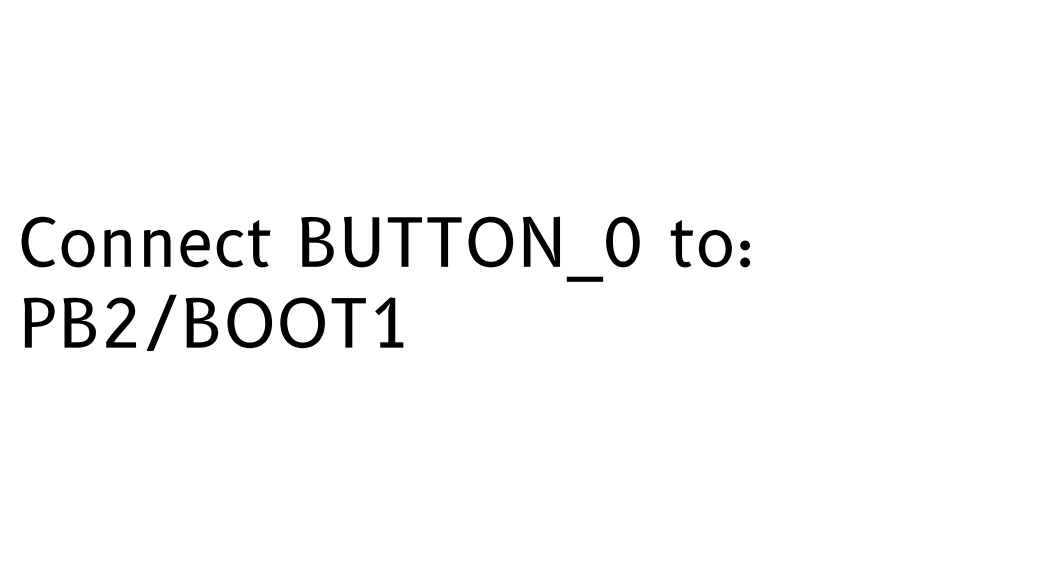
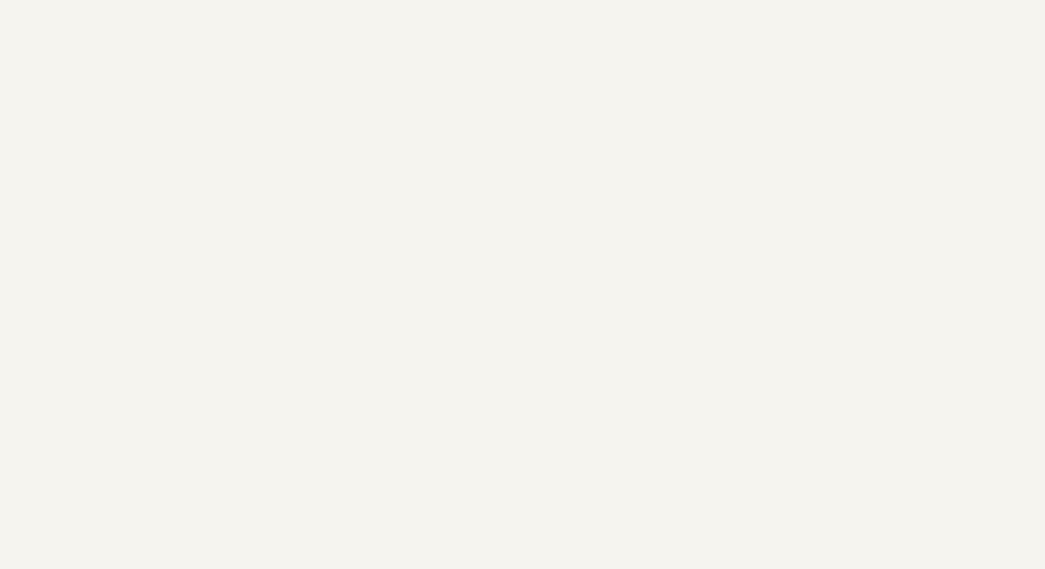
text: Connect BUTTON_0 to: (385, 249) -> none
text: PB2/BOOT1 (213, 322) -> none

